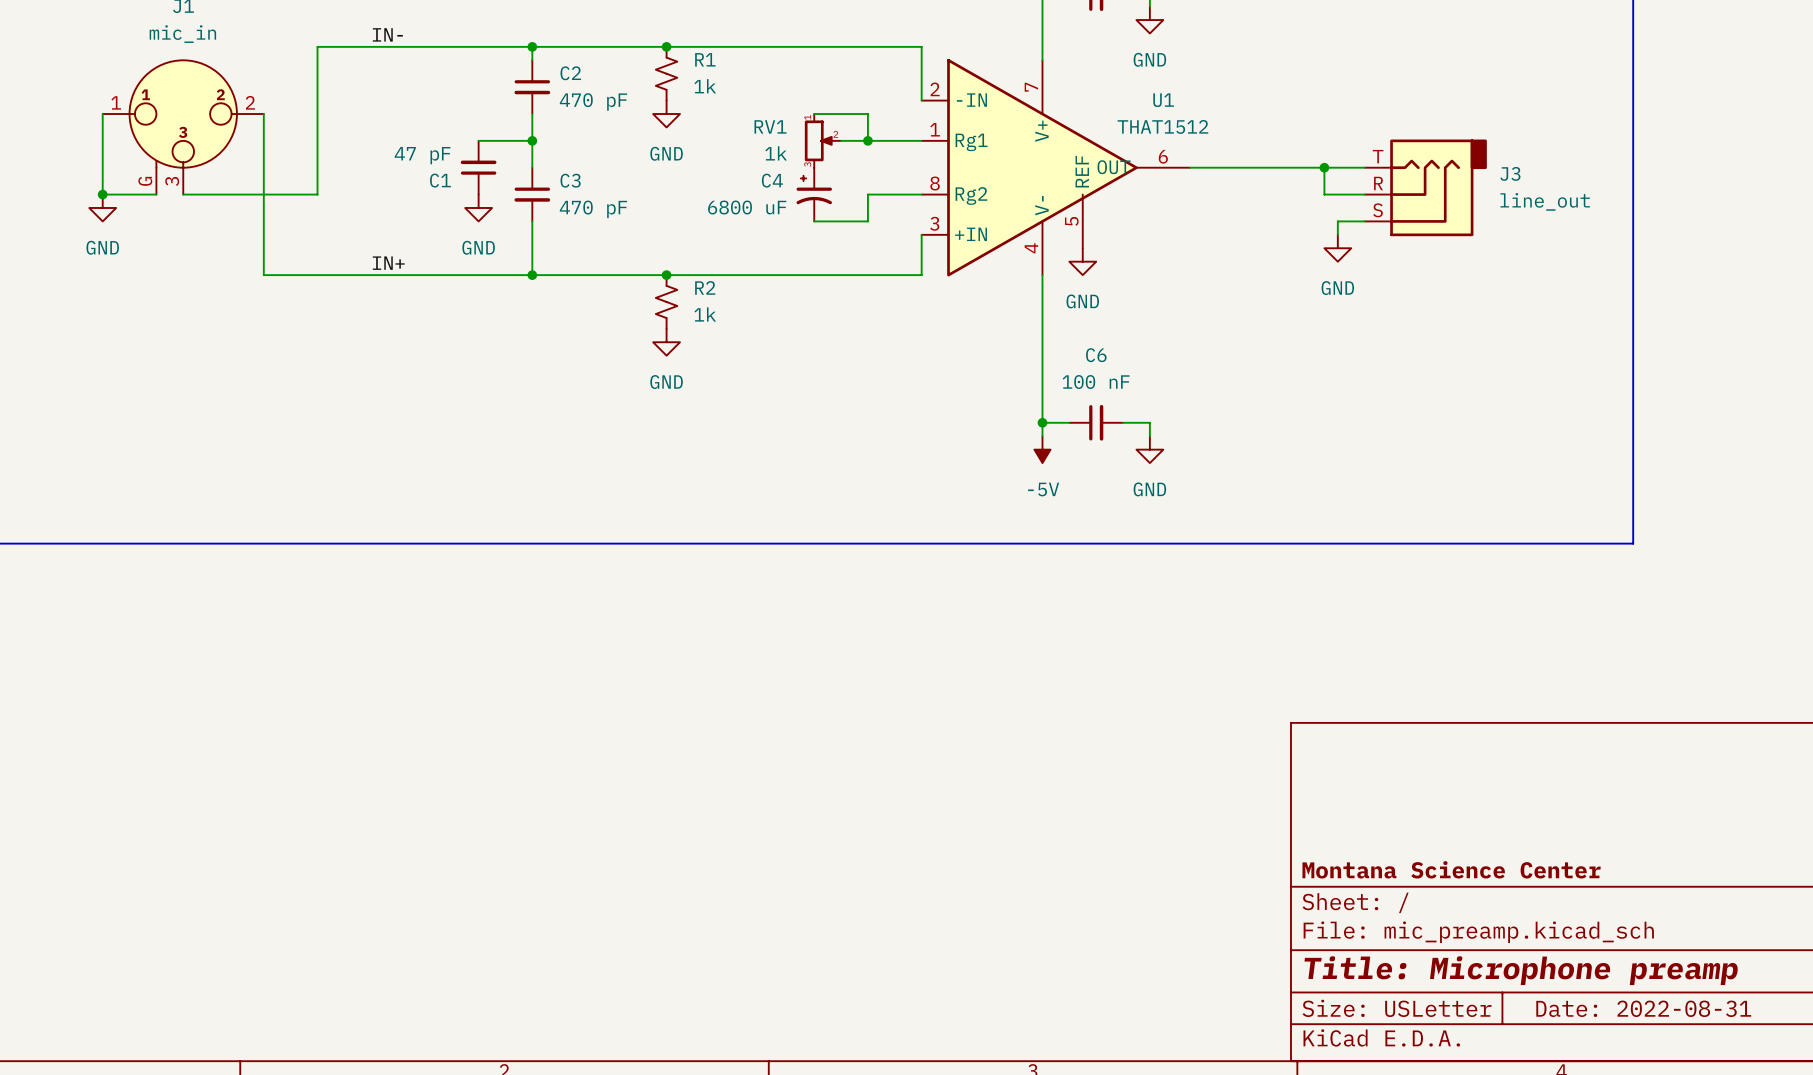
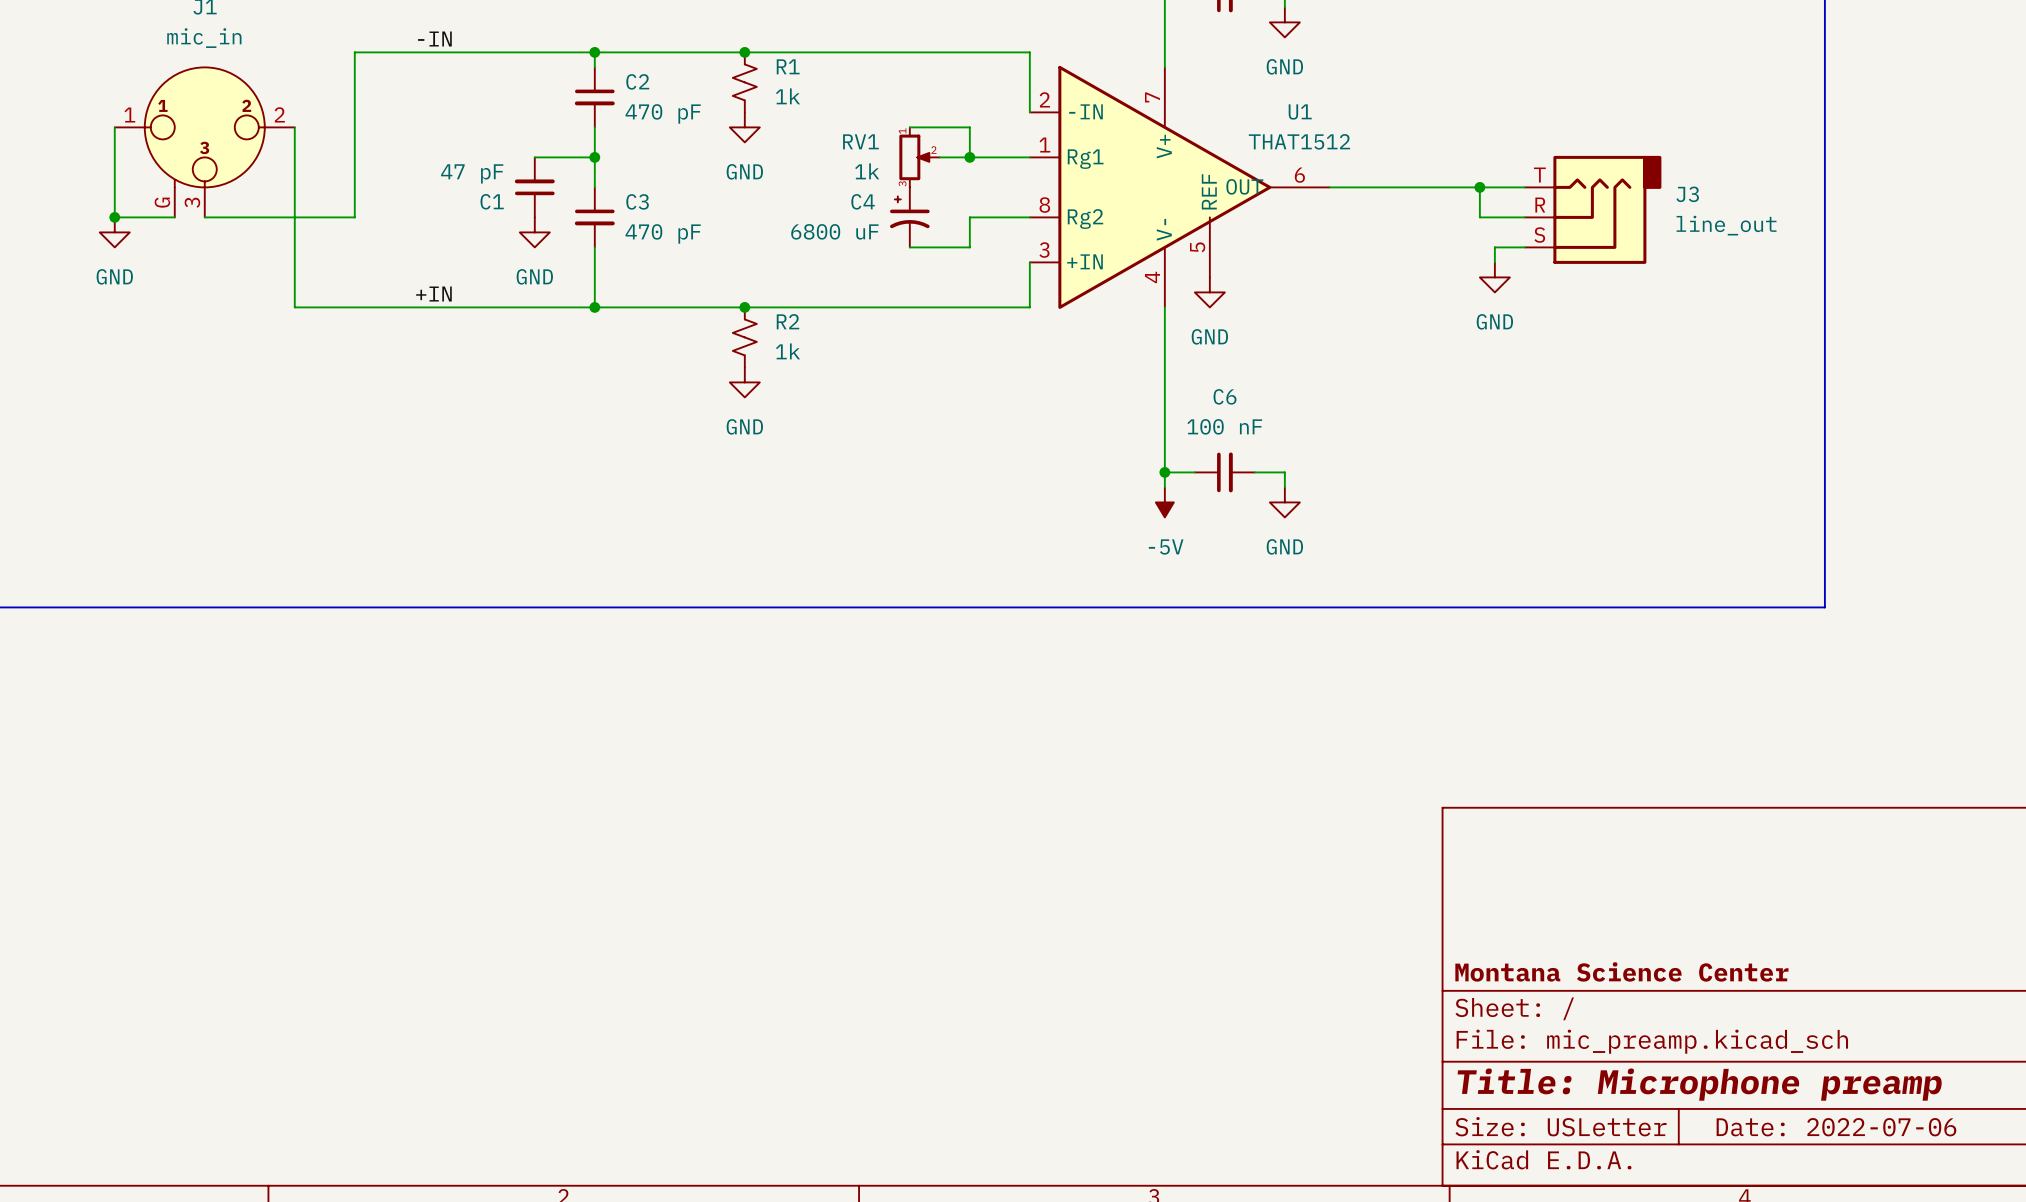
label: IN- (387, 34) -> -IN (434, 39)
label: IN+ (388, 263) -> +IN (433, 294)
title block: Date: 2022-08-31 (1643, 1008) -> Date: 2022-07-06 (1836, 1127)

